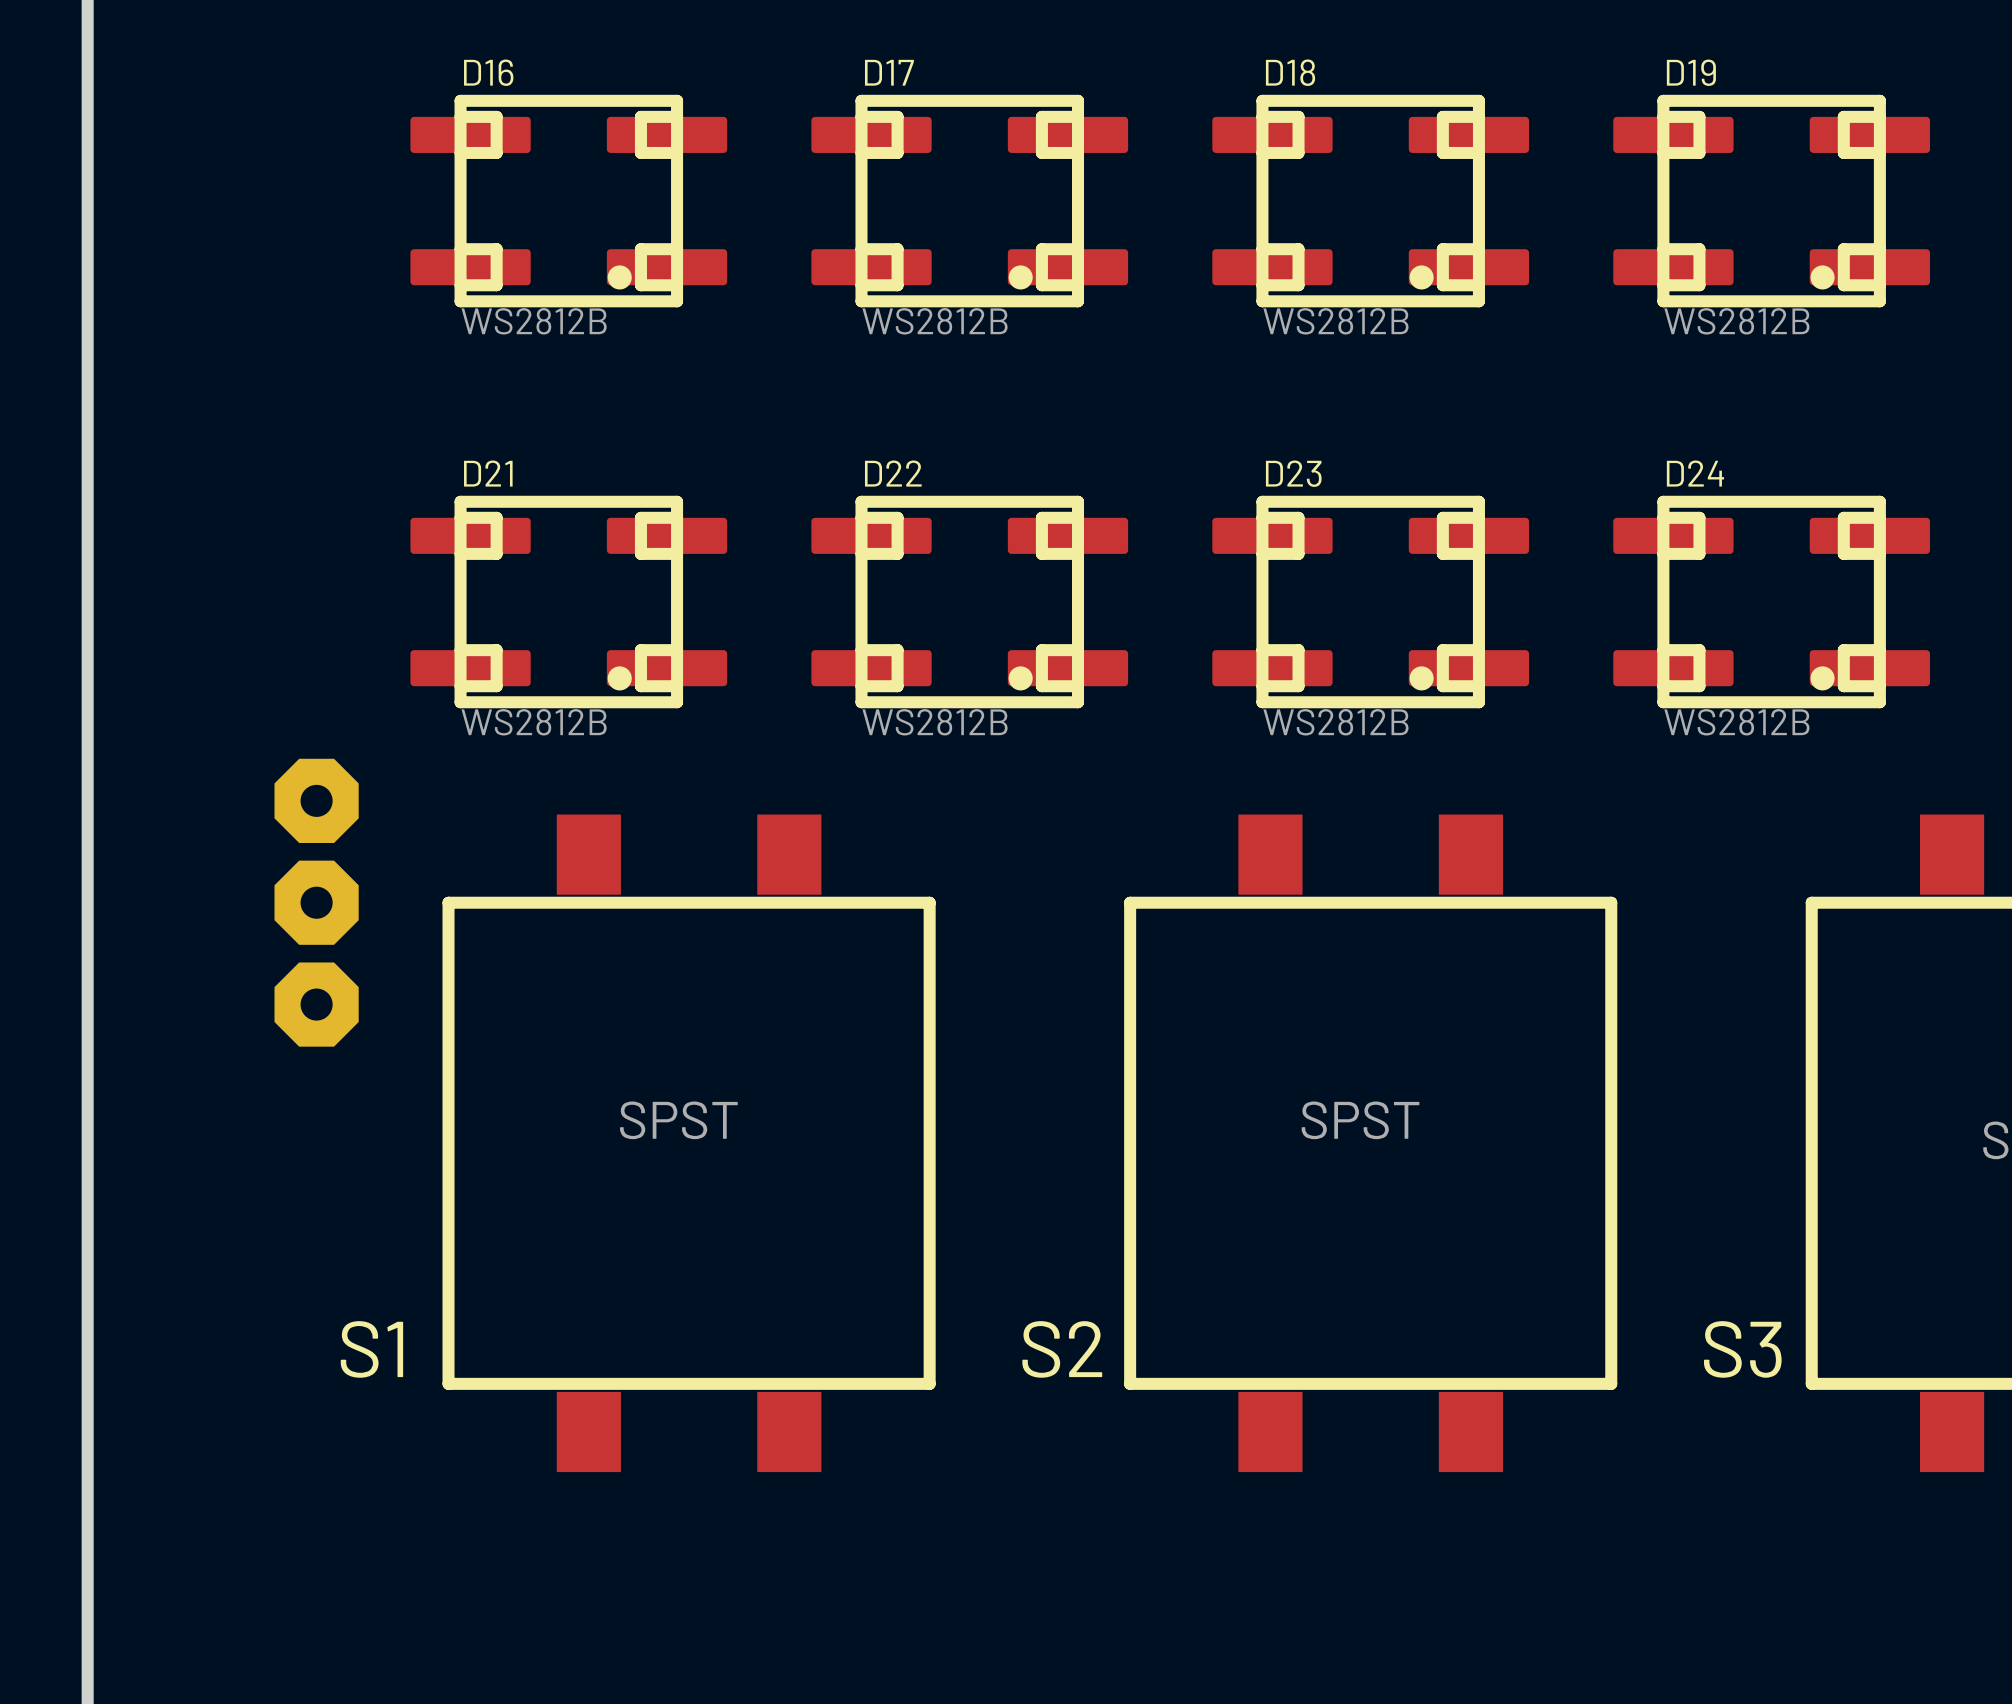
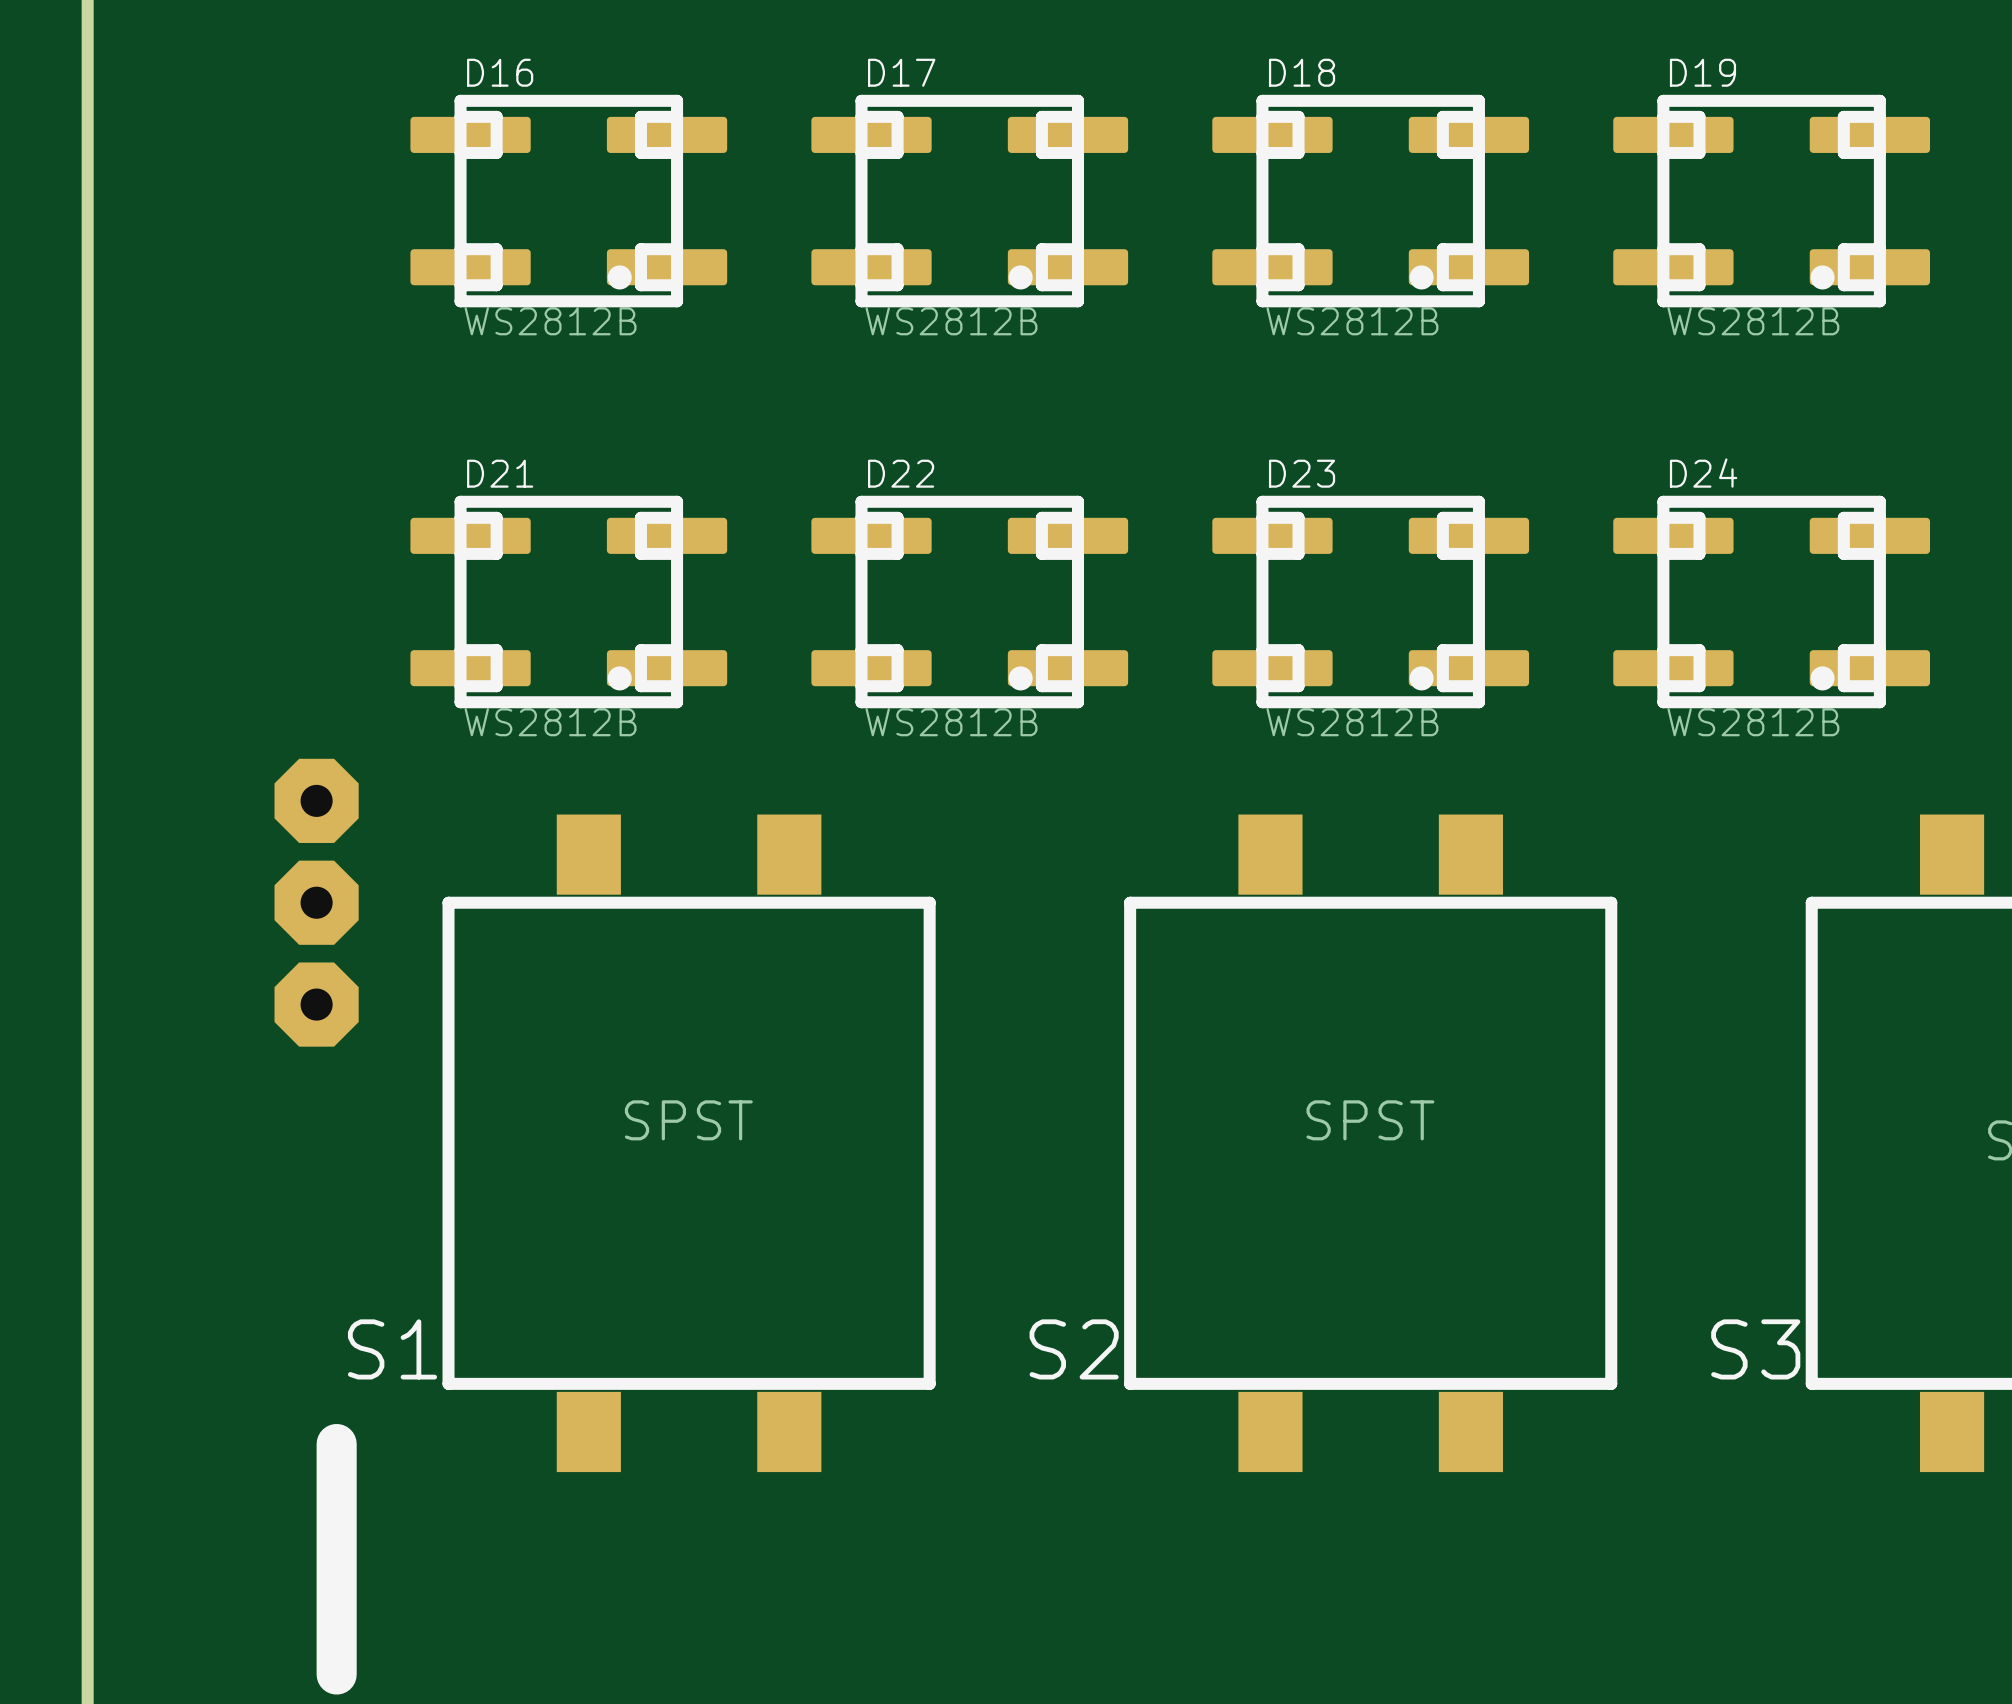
line: none -> (336, 1444) (336, 1674)

